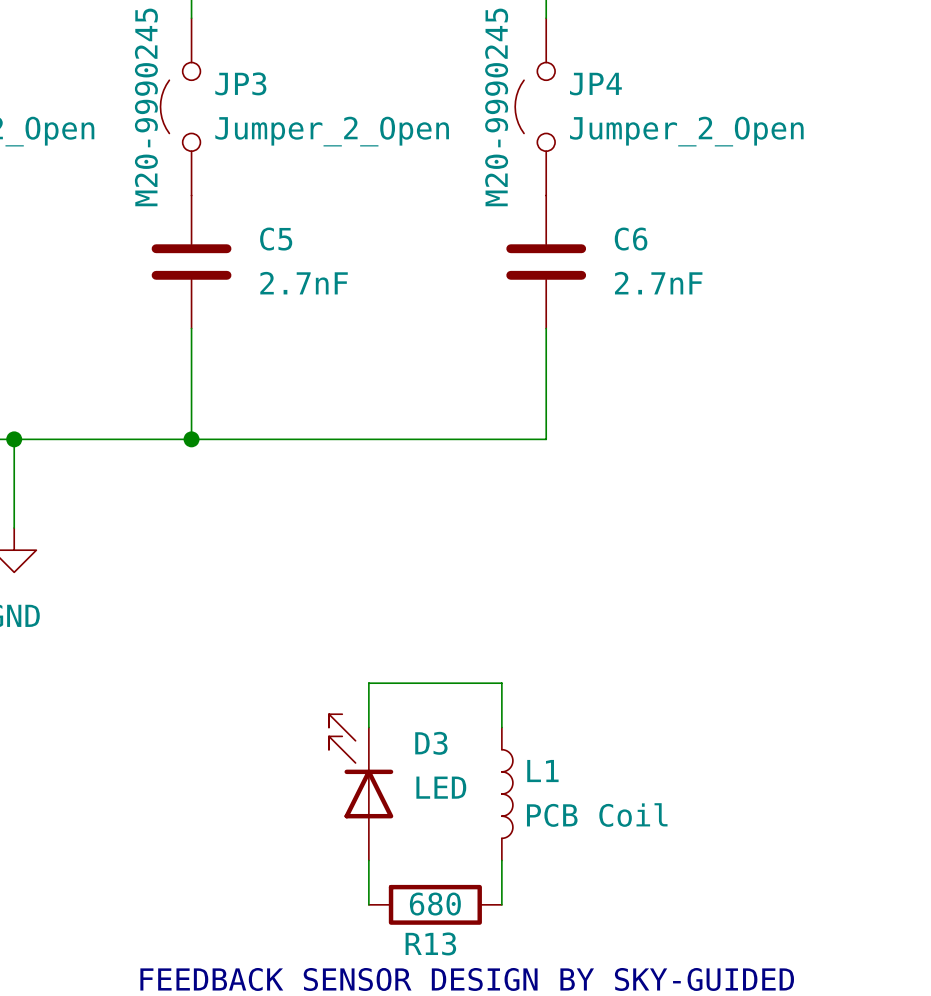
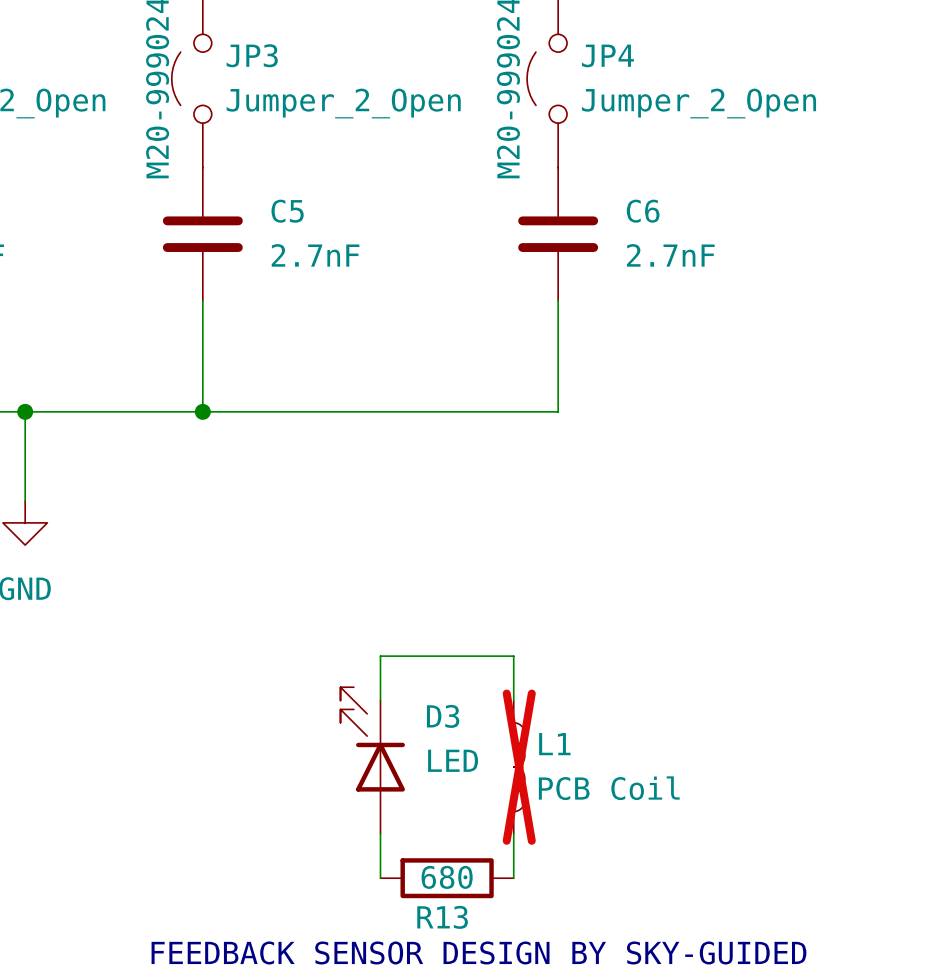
L1 do-not-place cross: none -> (519, 767)

